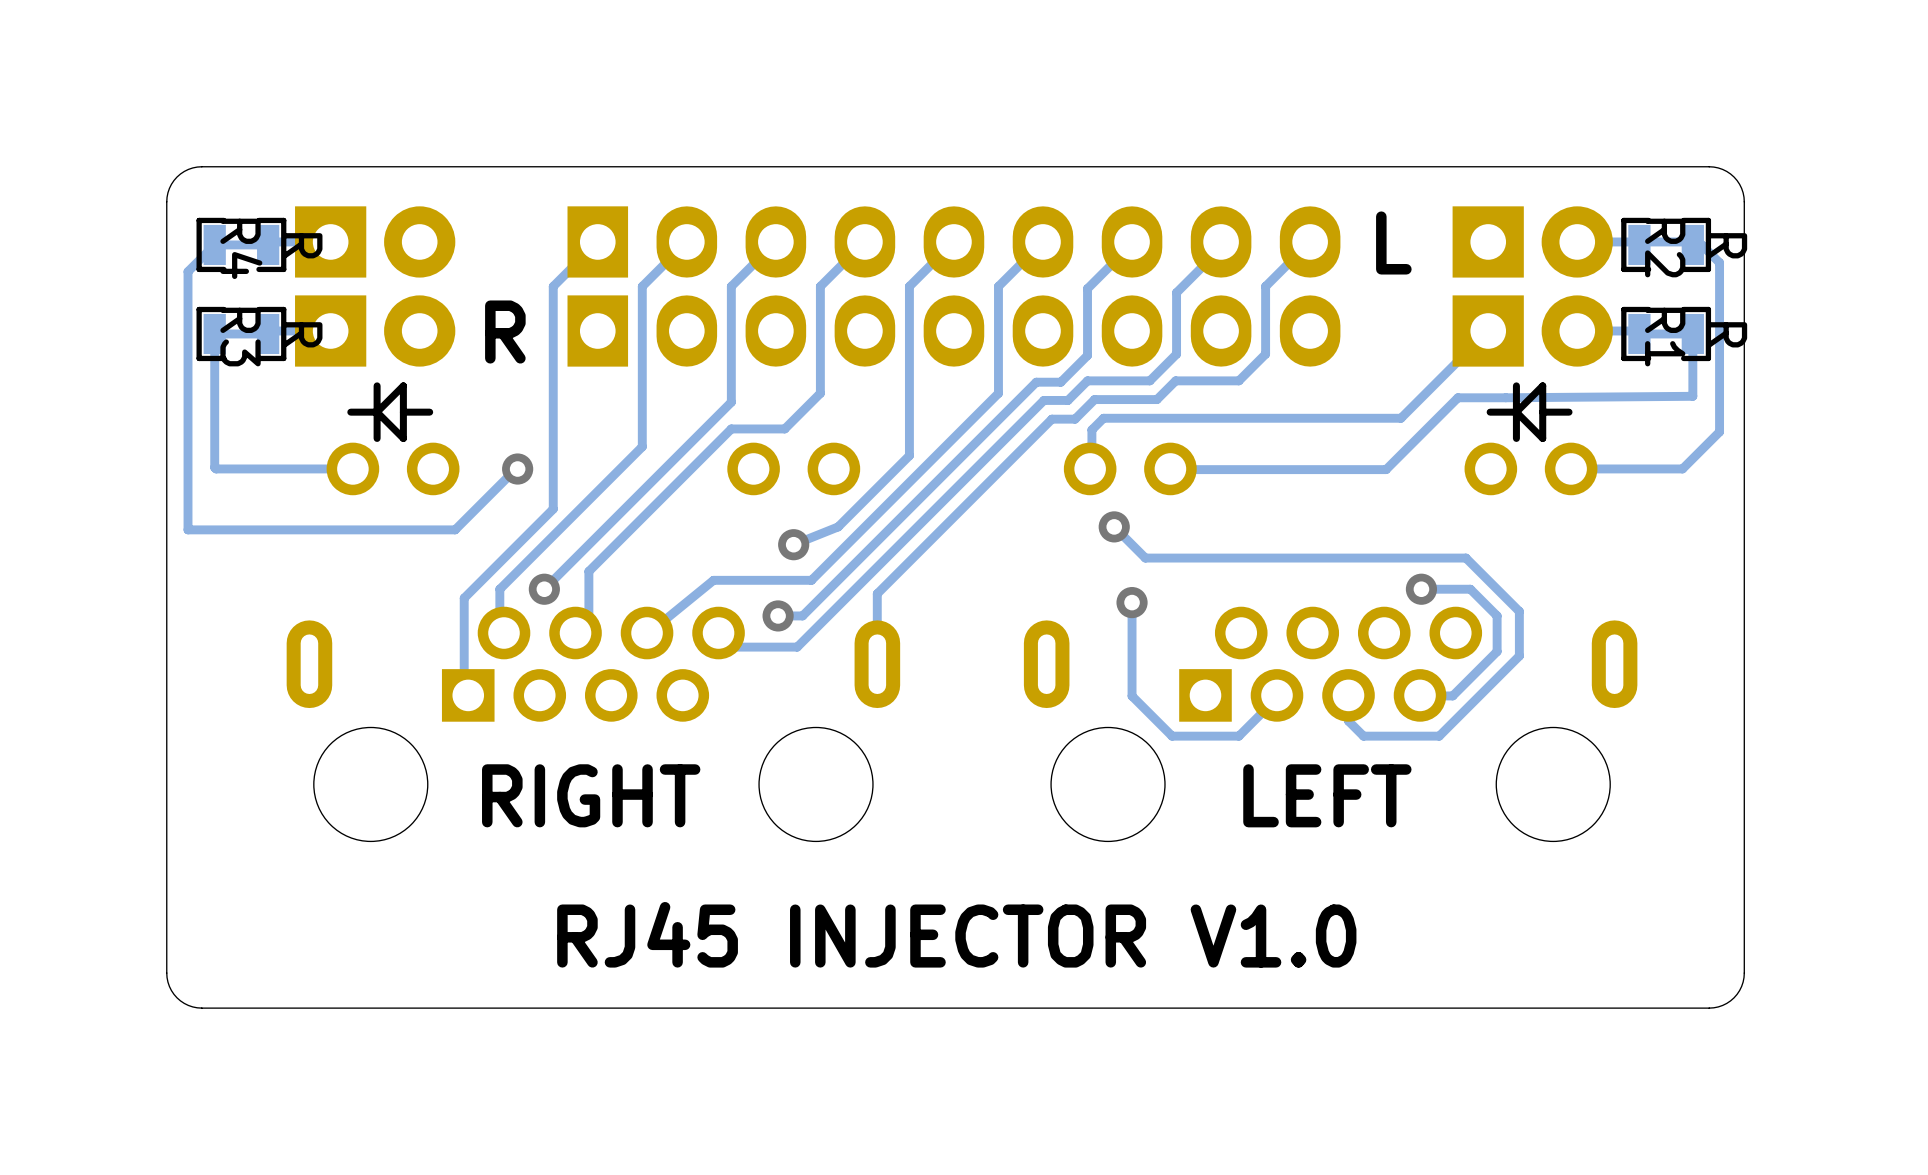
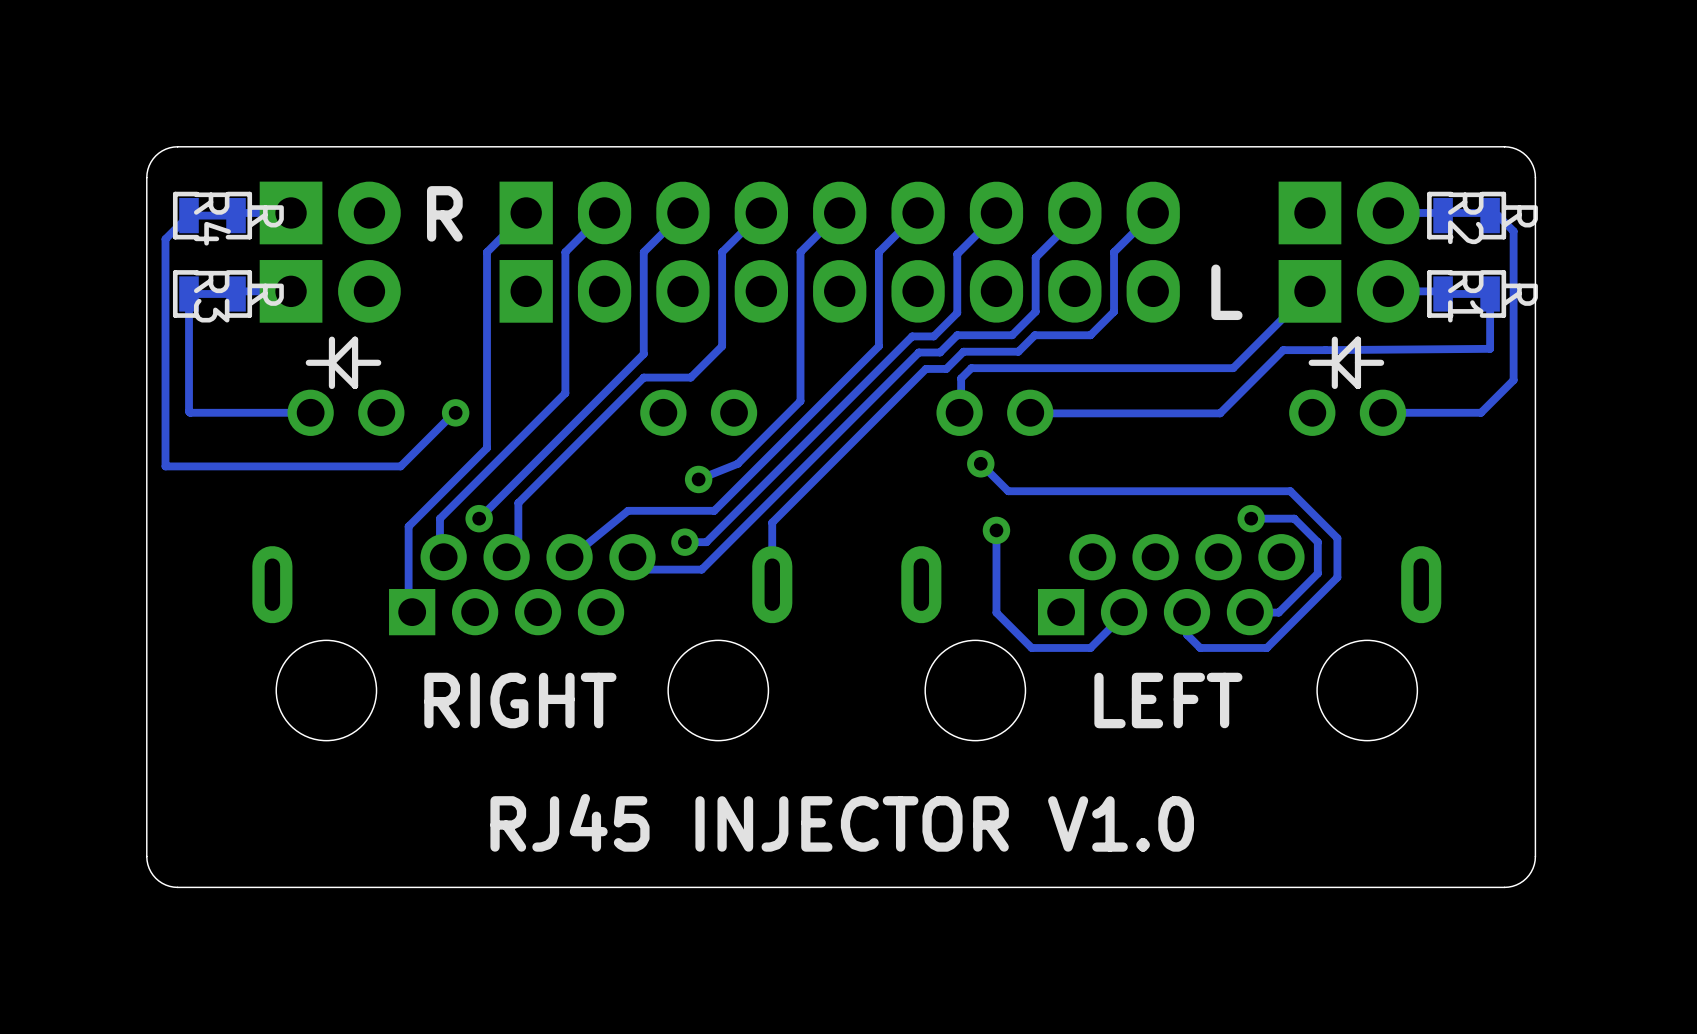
text position: L (1393, 242) -> L (1226, 292)
text position: R (505, 332) -> R (444, 213)

